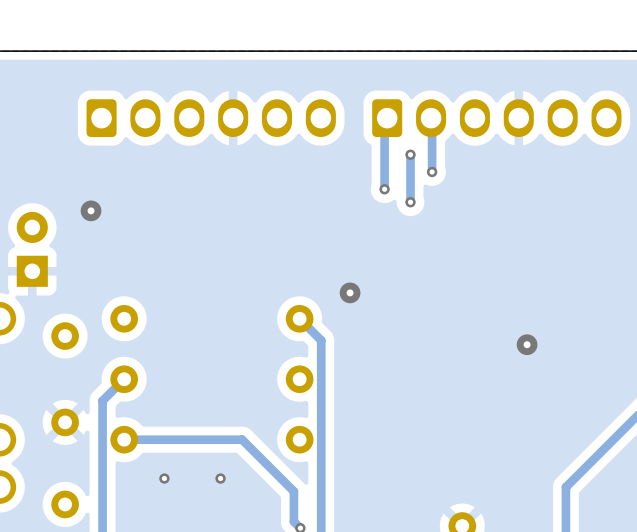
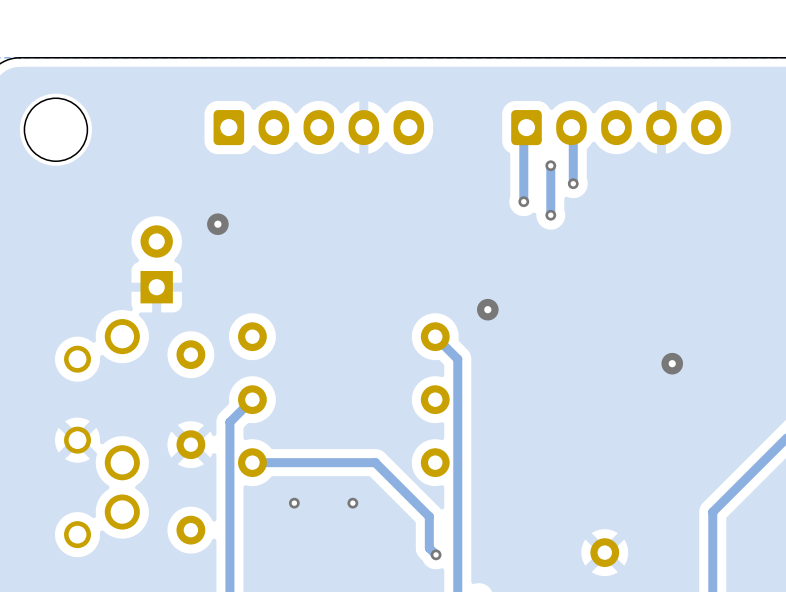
part: none -> (318, 127)
part: (211, 118) -> none
part: none -> (616, 127)
part: (496, 118) -> none

